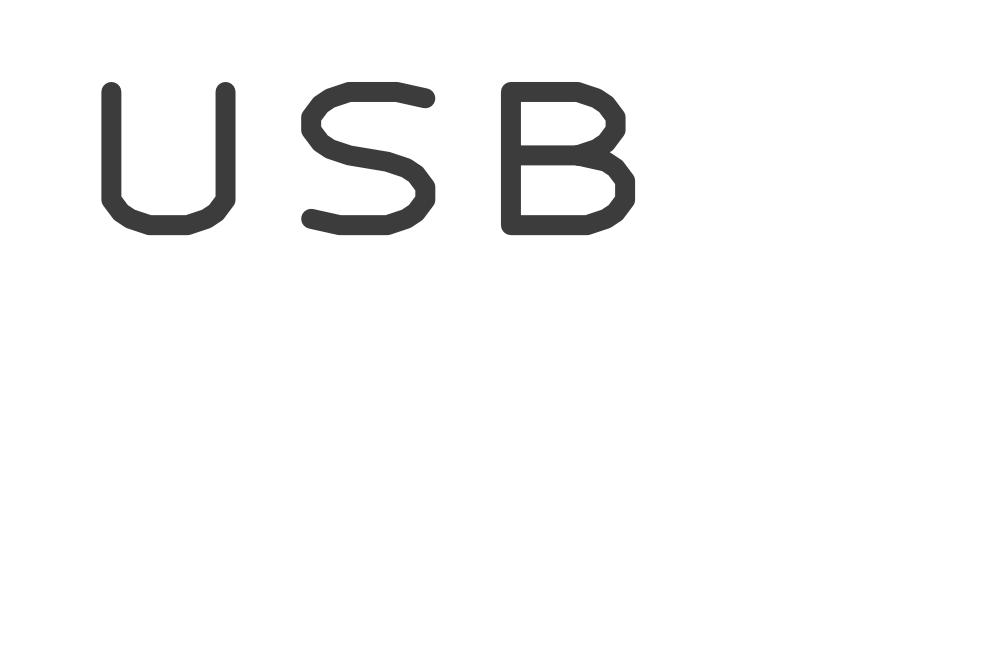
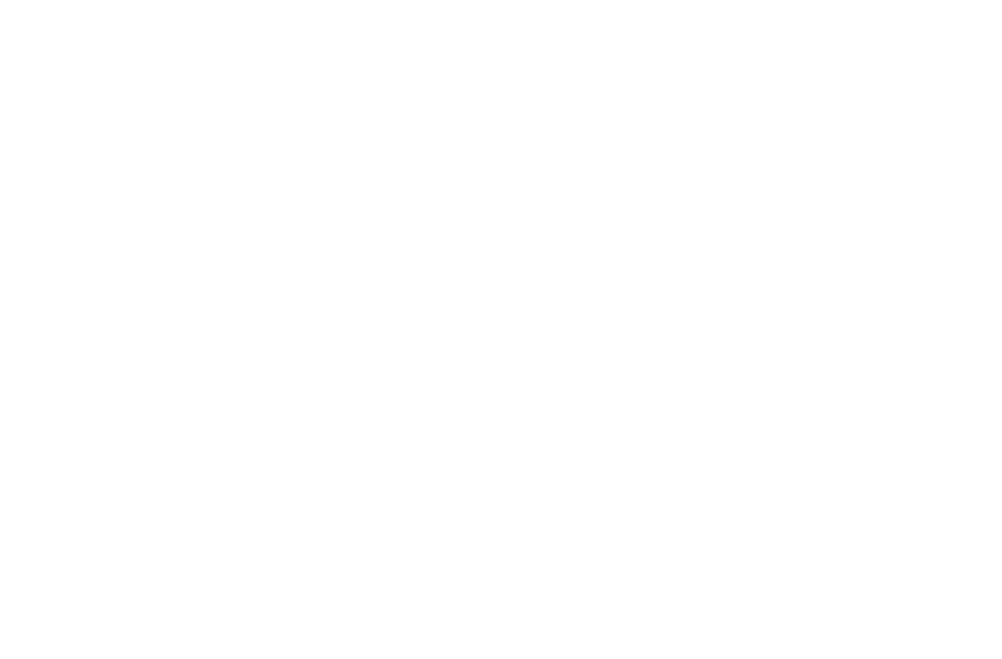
text: USB (368, 158) -> none

